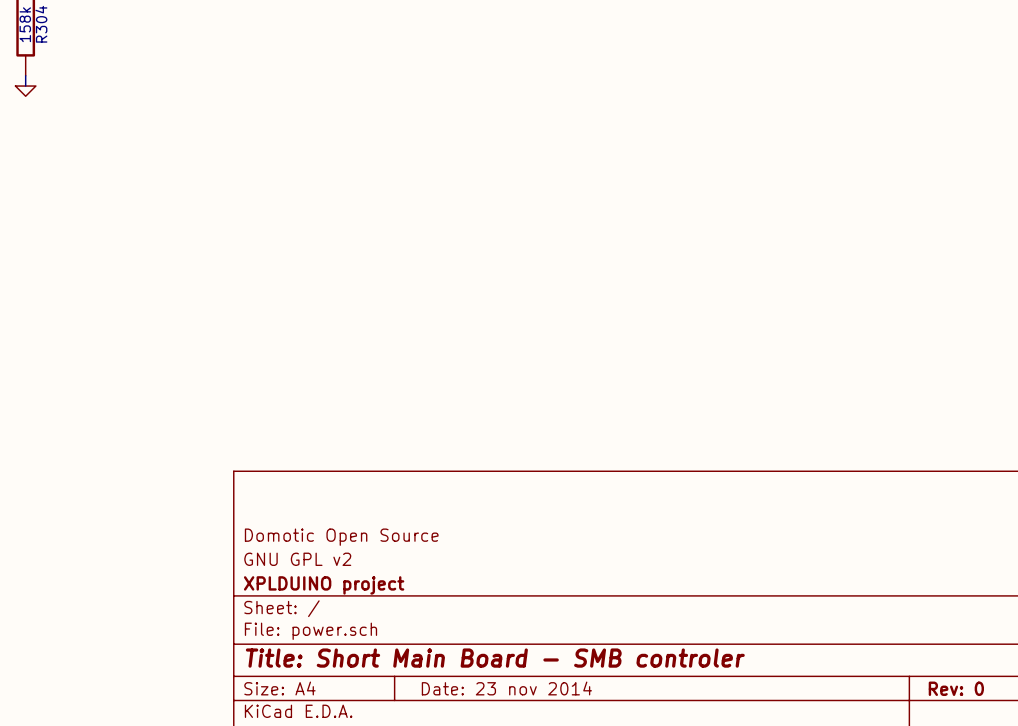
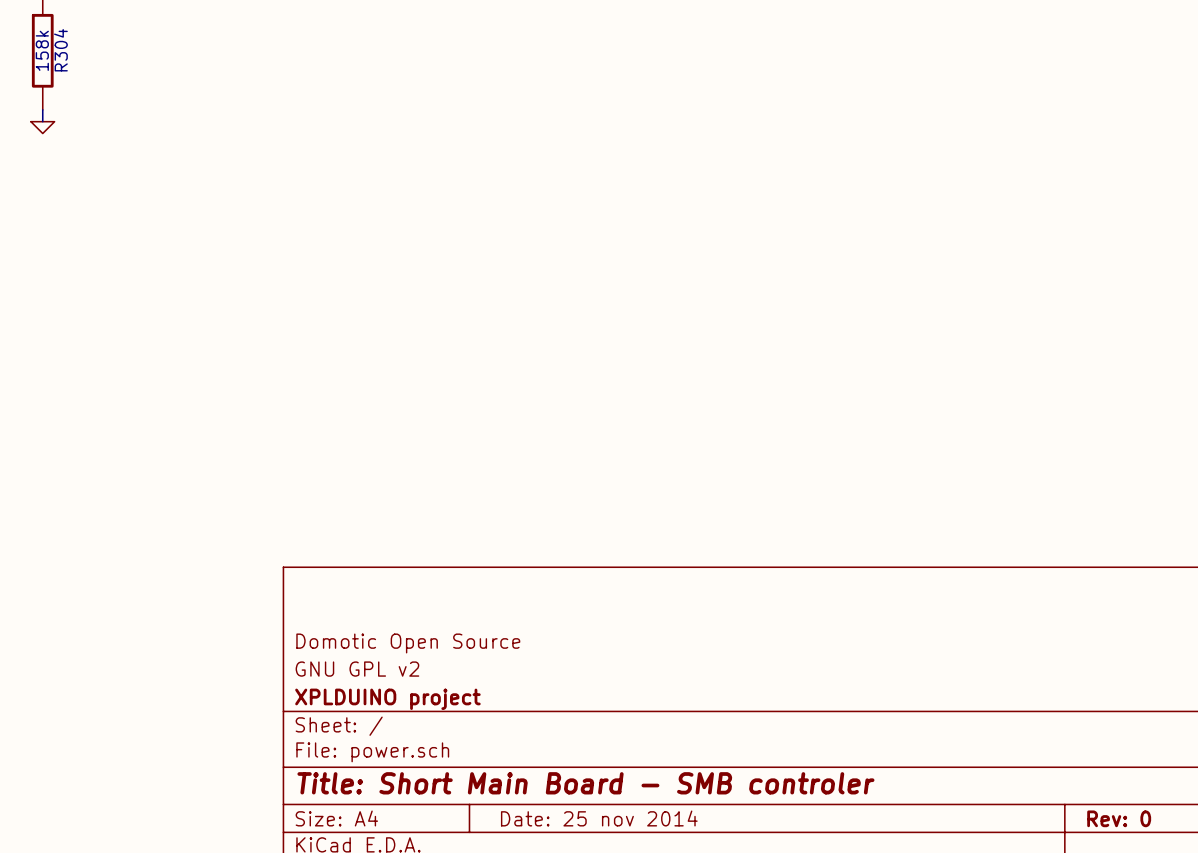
title block: Date: 23 nov 2014 (506, 688) -> Date: 25 nov 2014 (599, 818)

